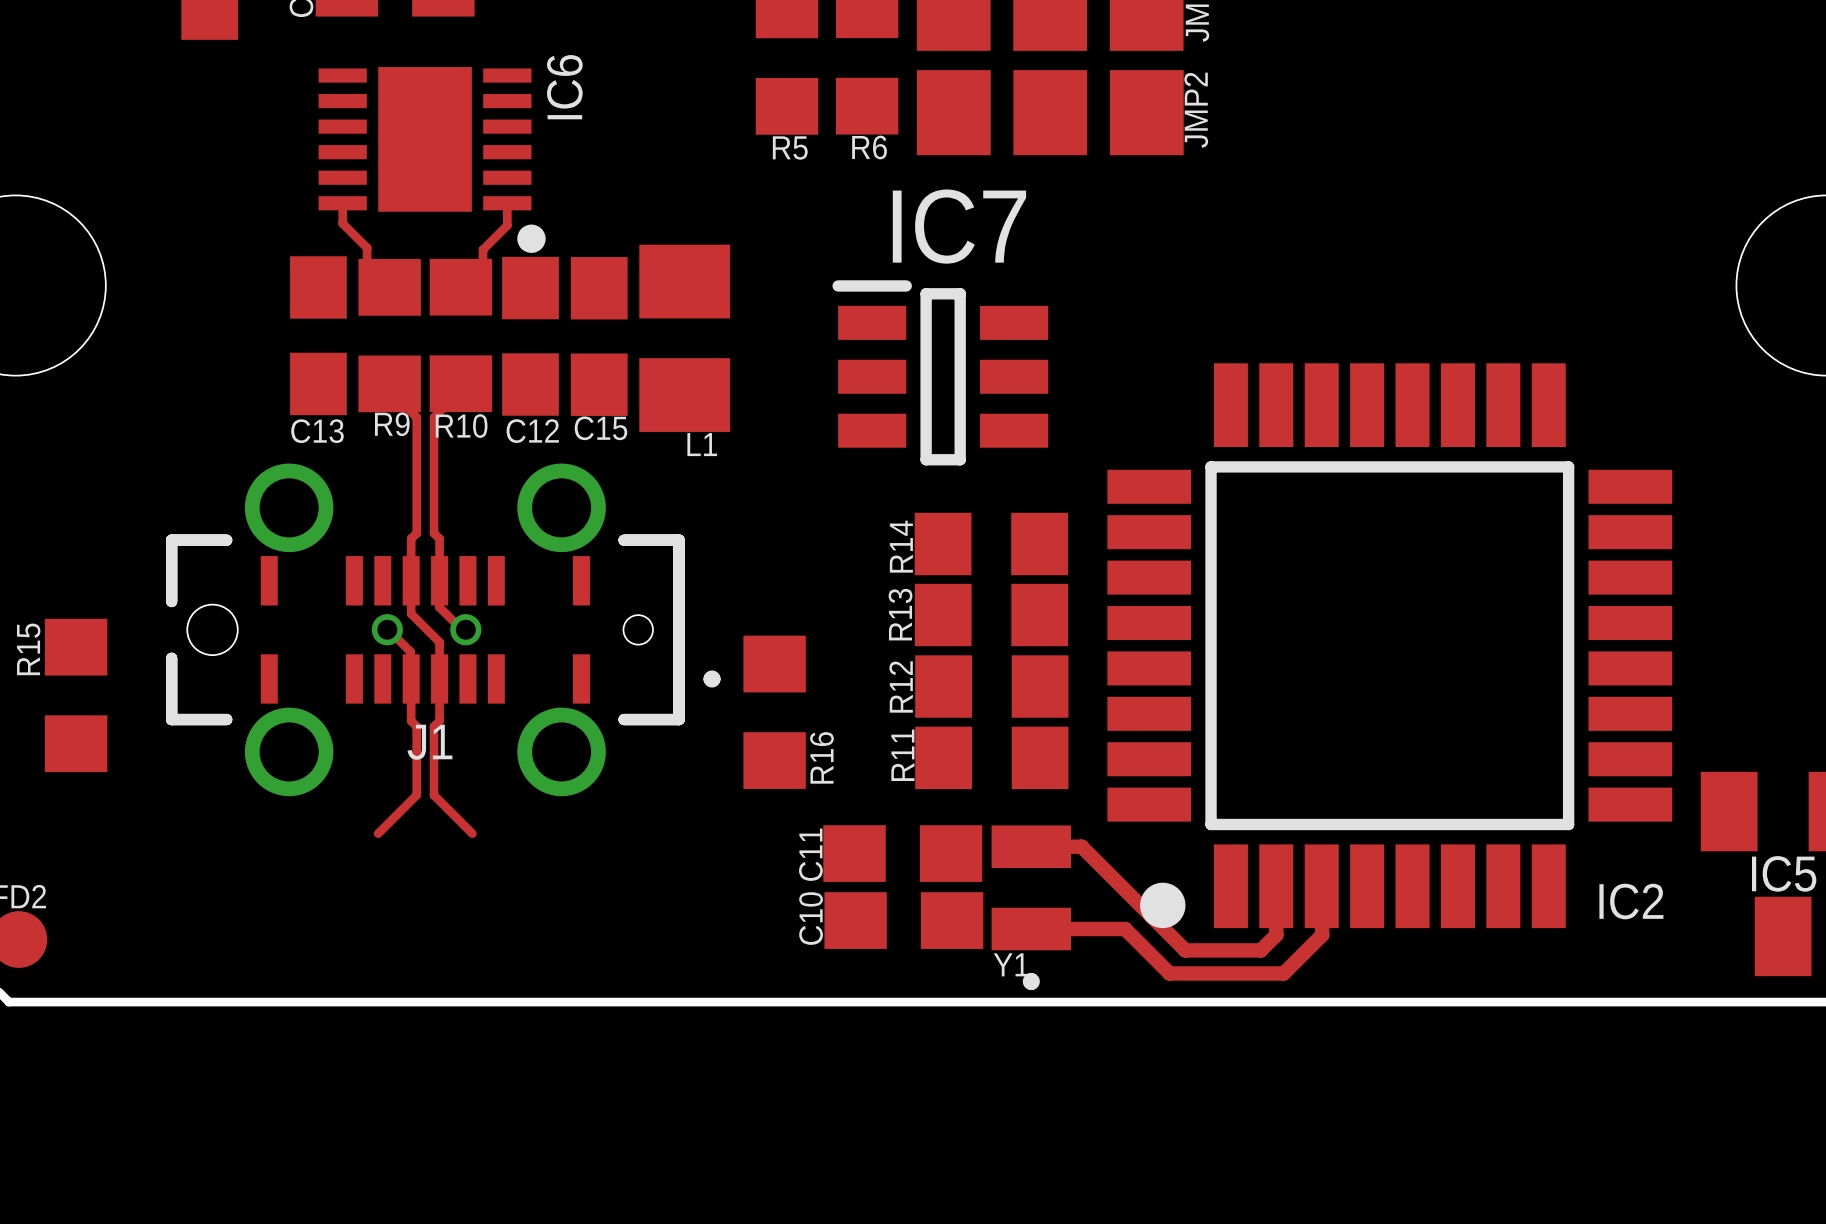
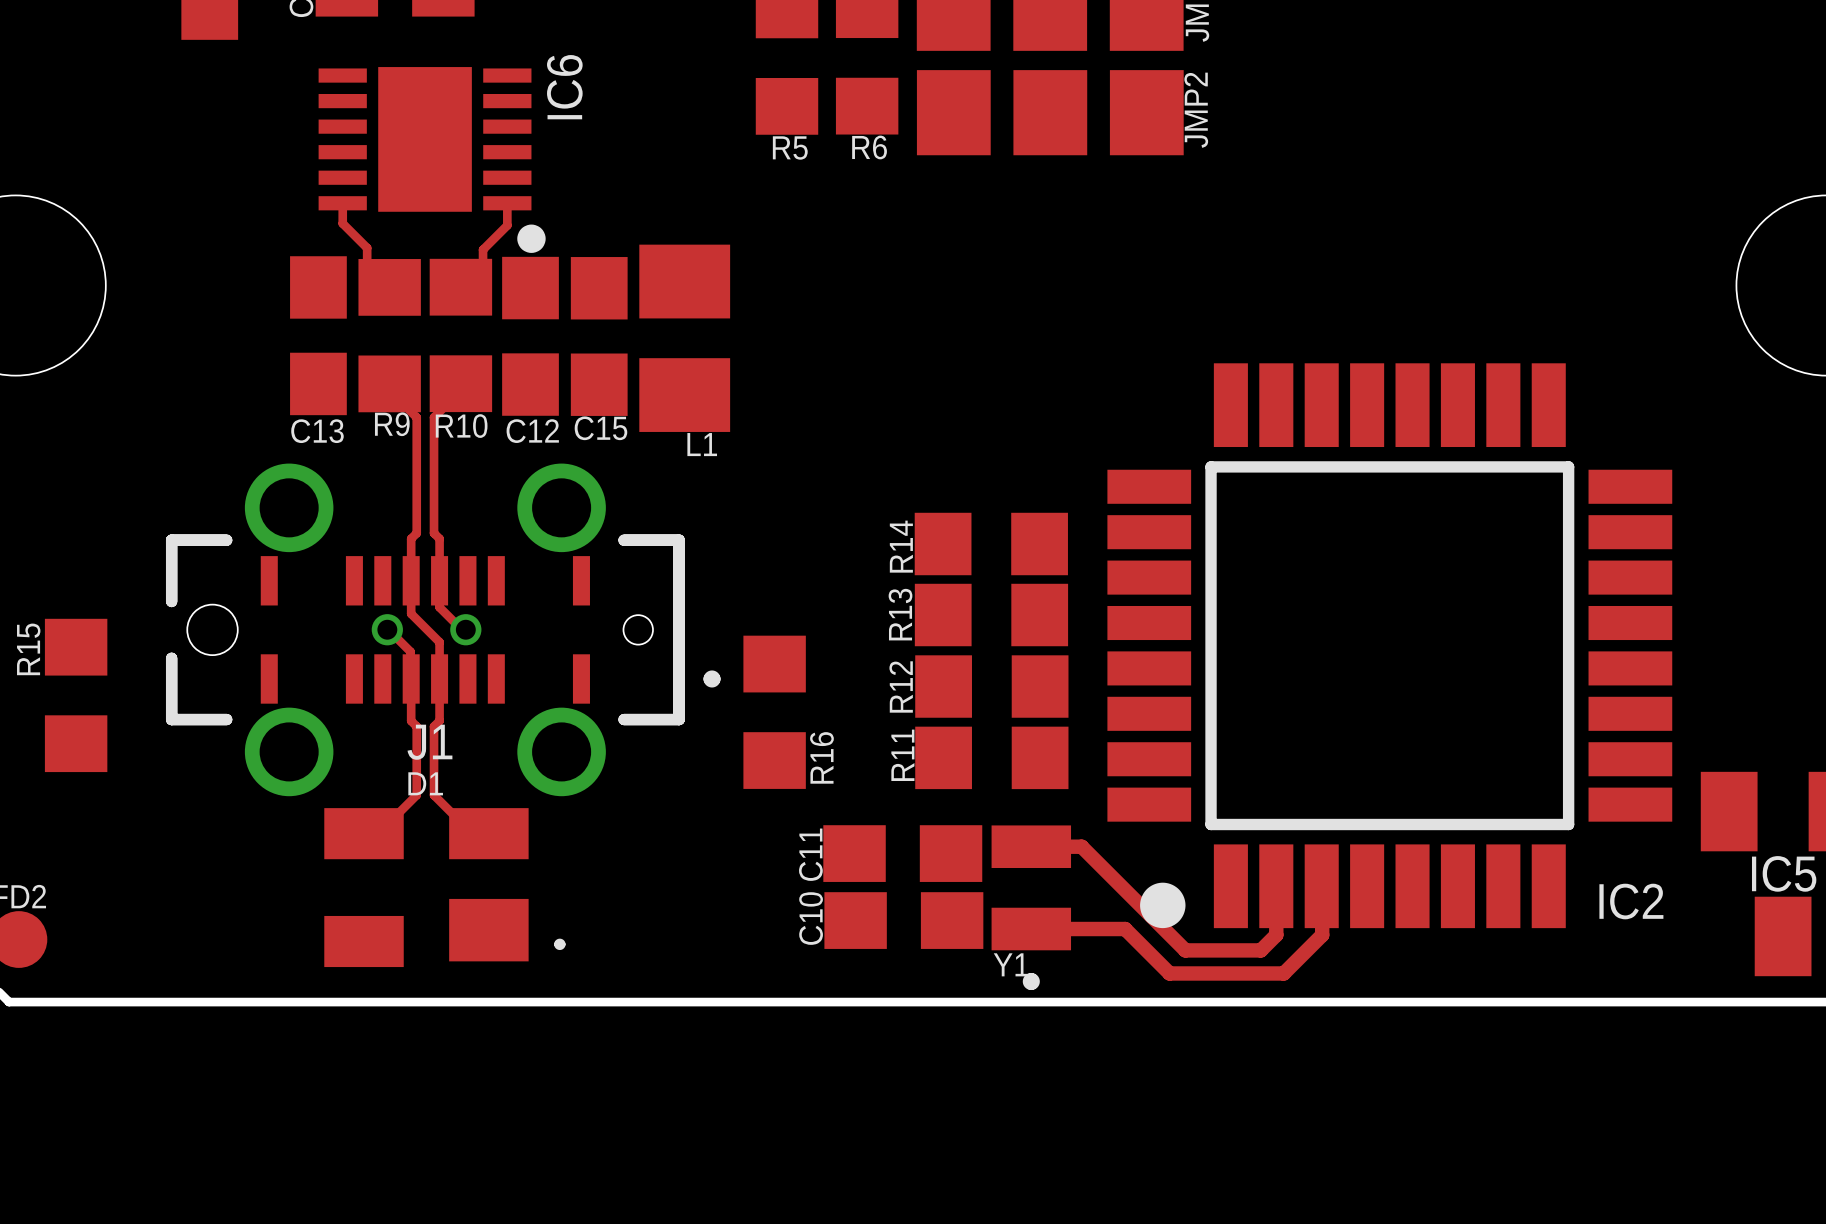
IC7: (940, 372) -> none
D1: none -> (444, 887)

